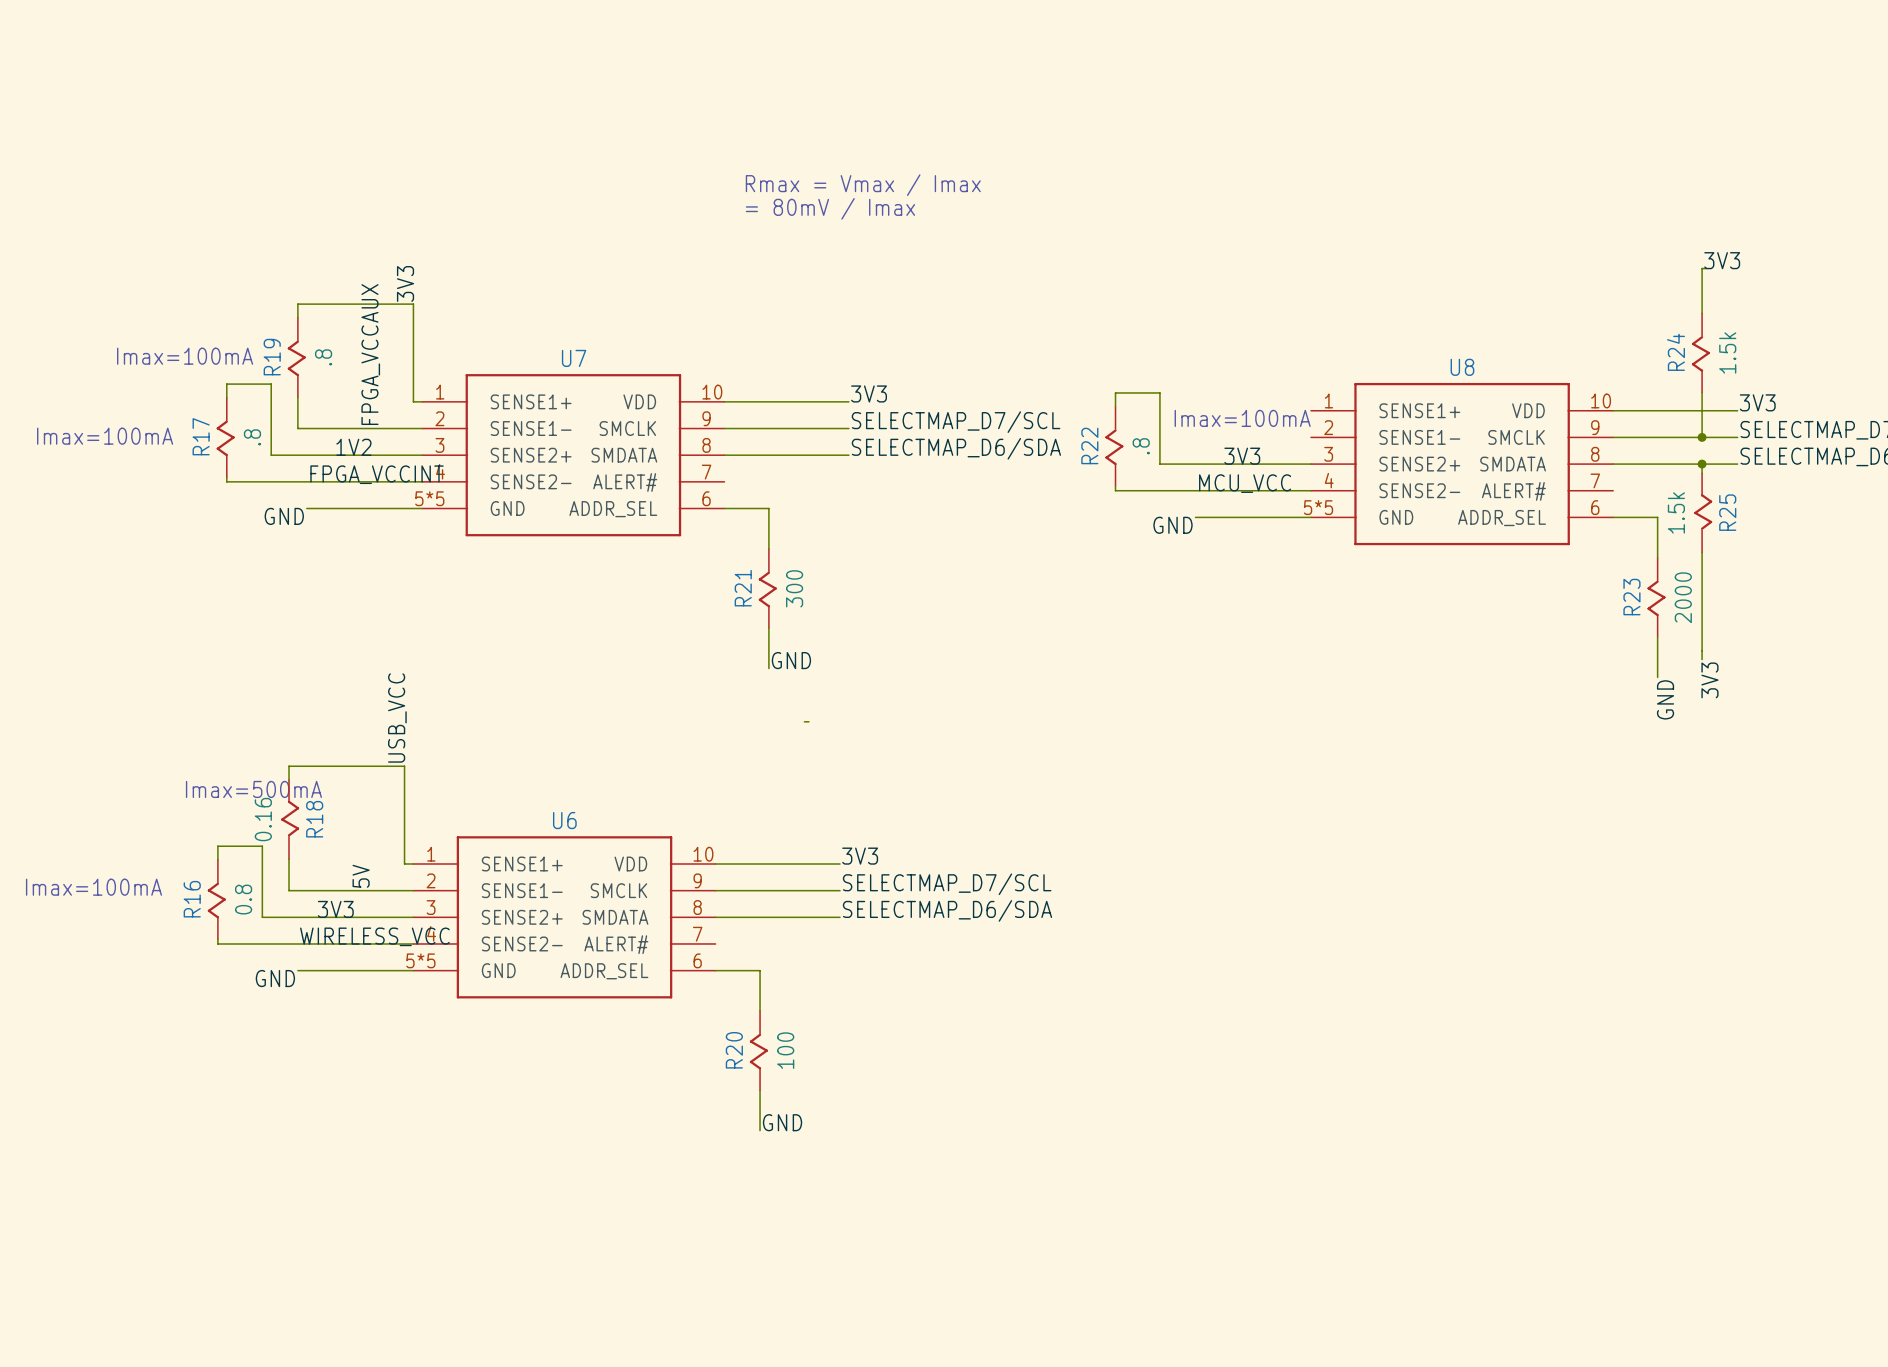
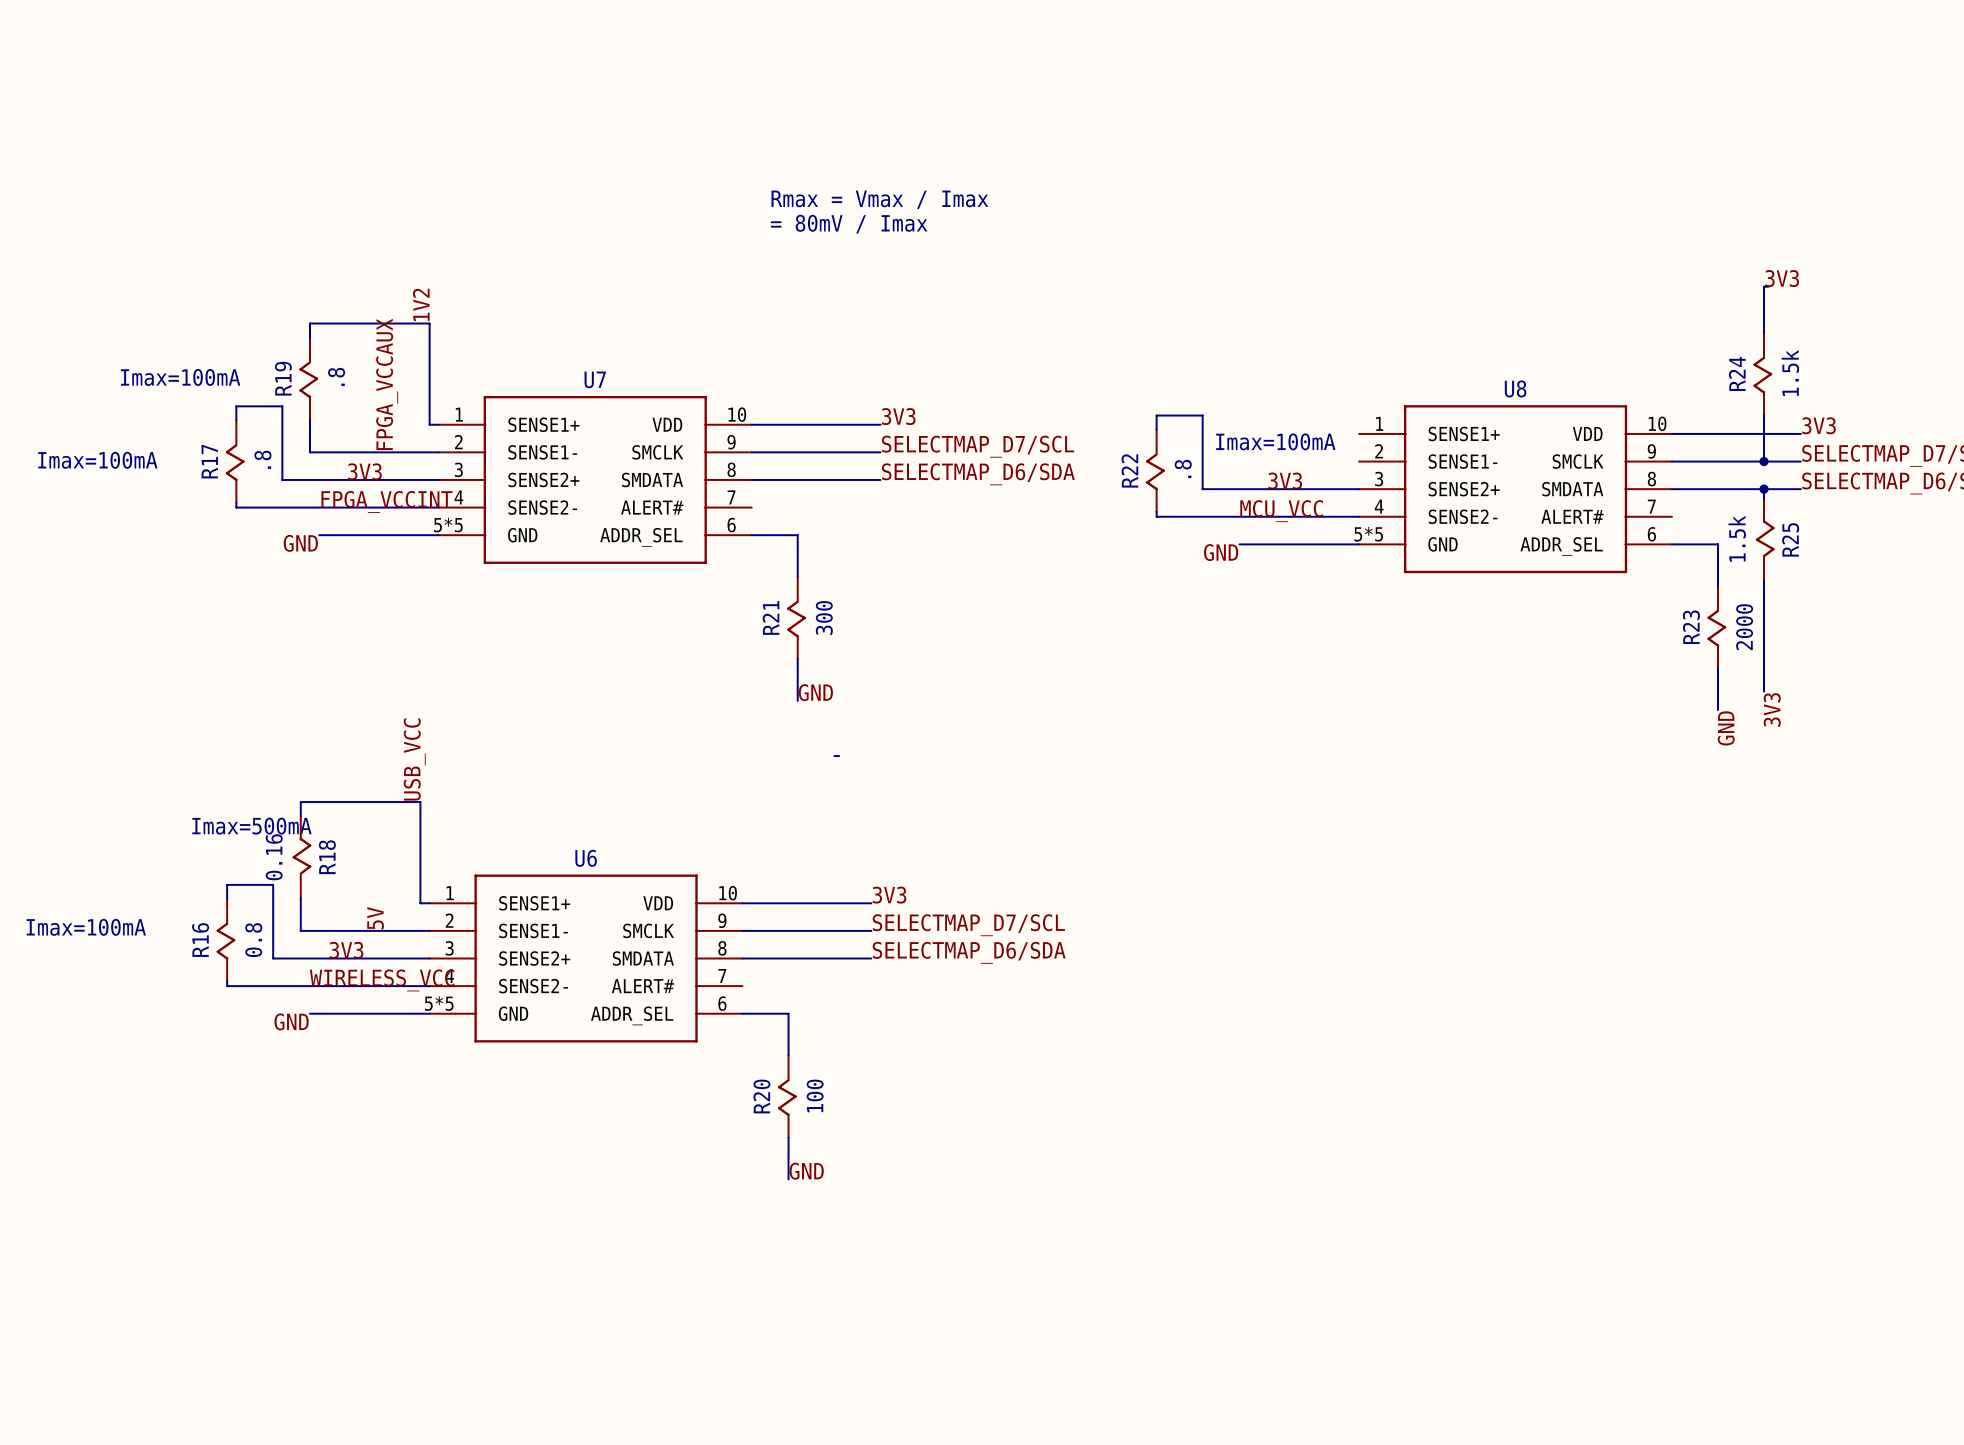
label: 3V3 (405, 283) -> 1V2 (421, 304)
label: 1V2 (353, 447) -> 3V3 (364, 471)

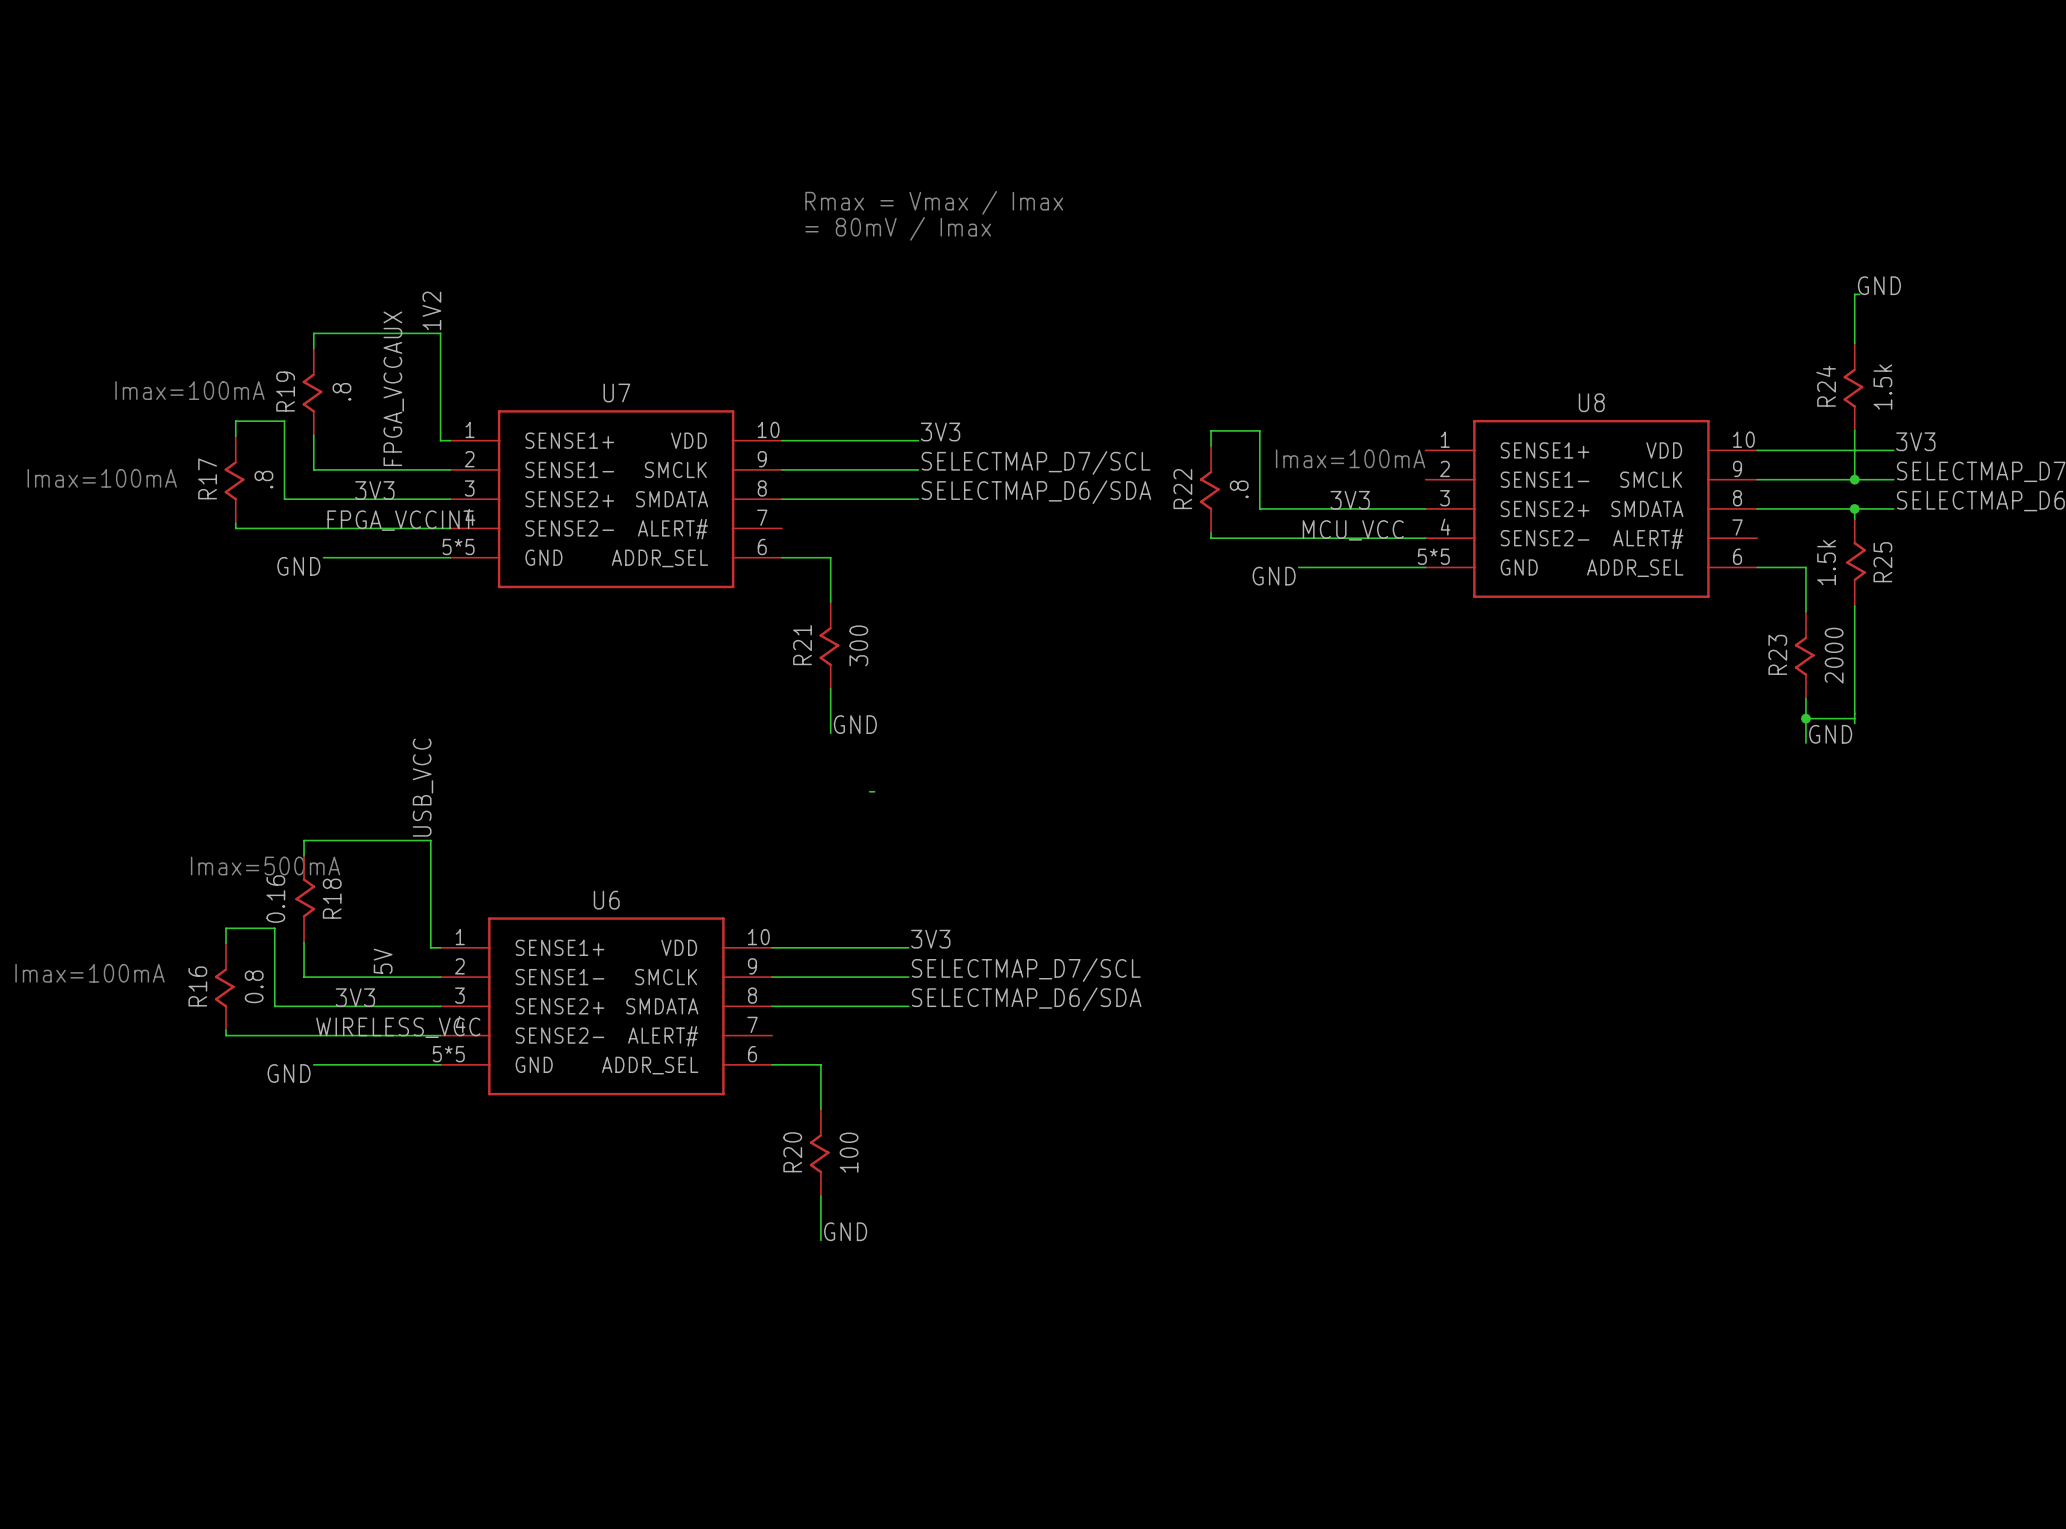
label: 3V3 (1782, 278) -> GND (1879, 285)
wire: none -> (1805, 718) (1854, 718)
junction: none -> (1805, 718)
label: 3V3 (1772, 709) -> none
label rotation: 0° (1726, 728) -> 90° clockwise (1830, 734)

